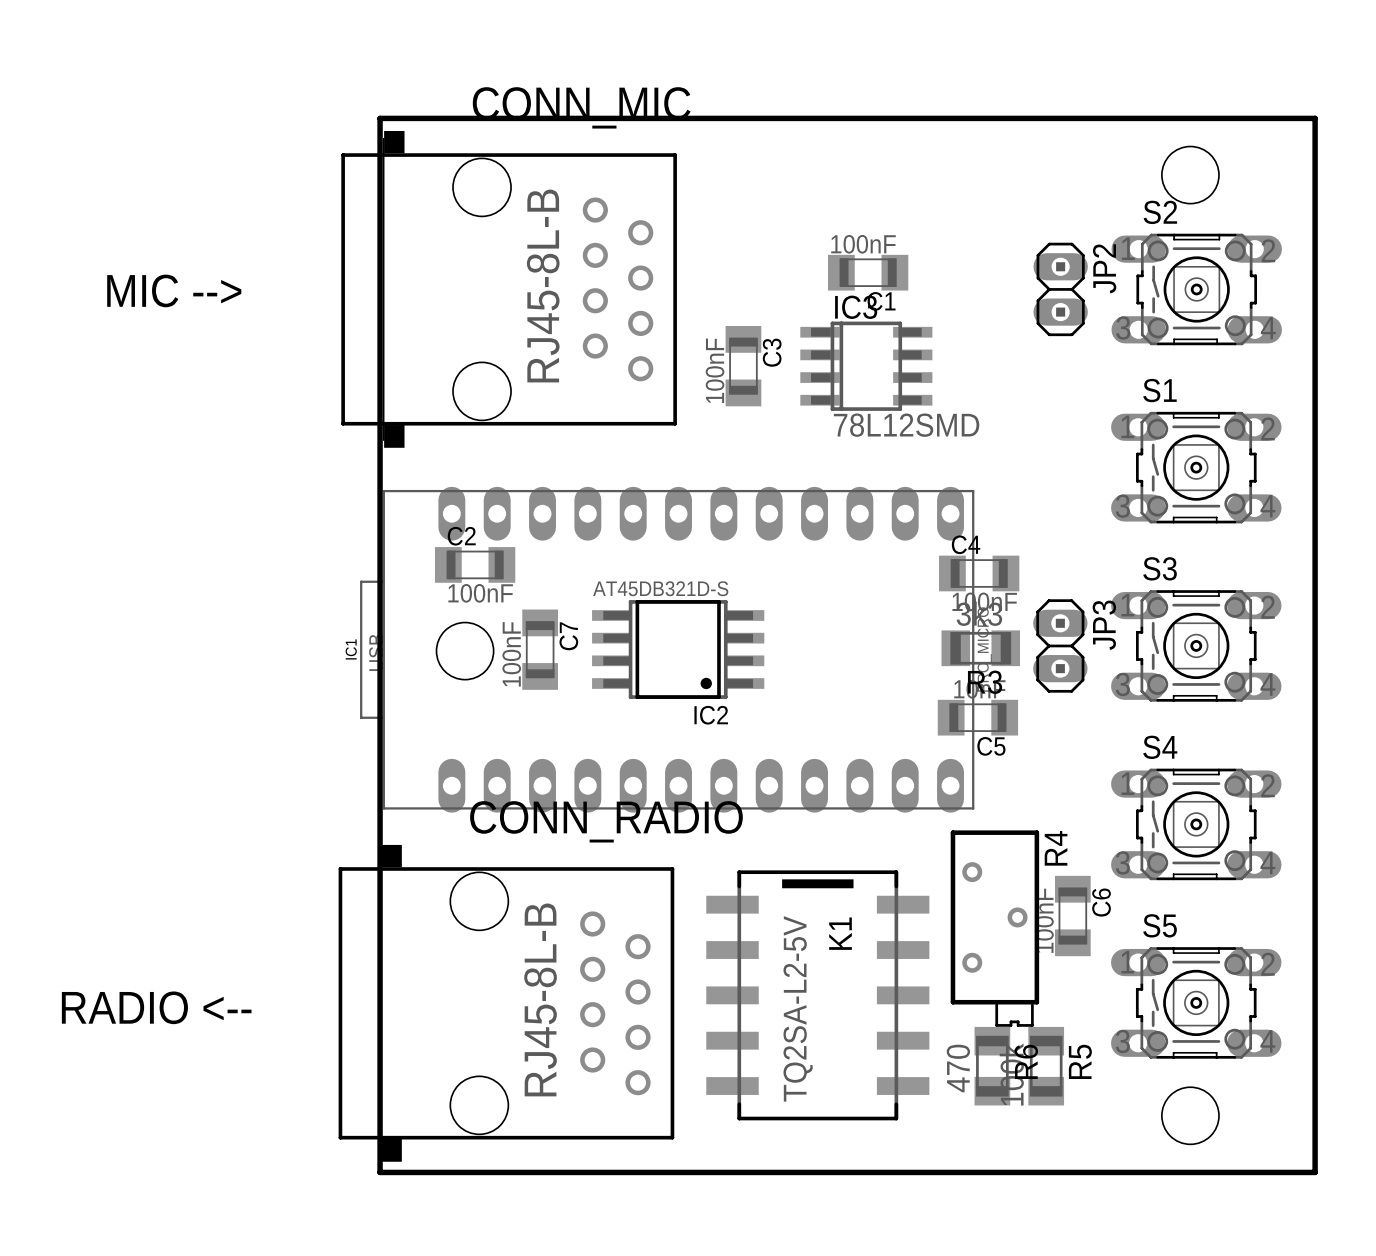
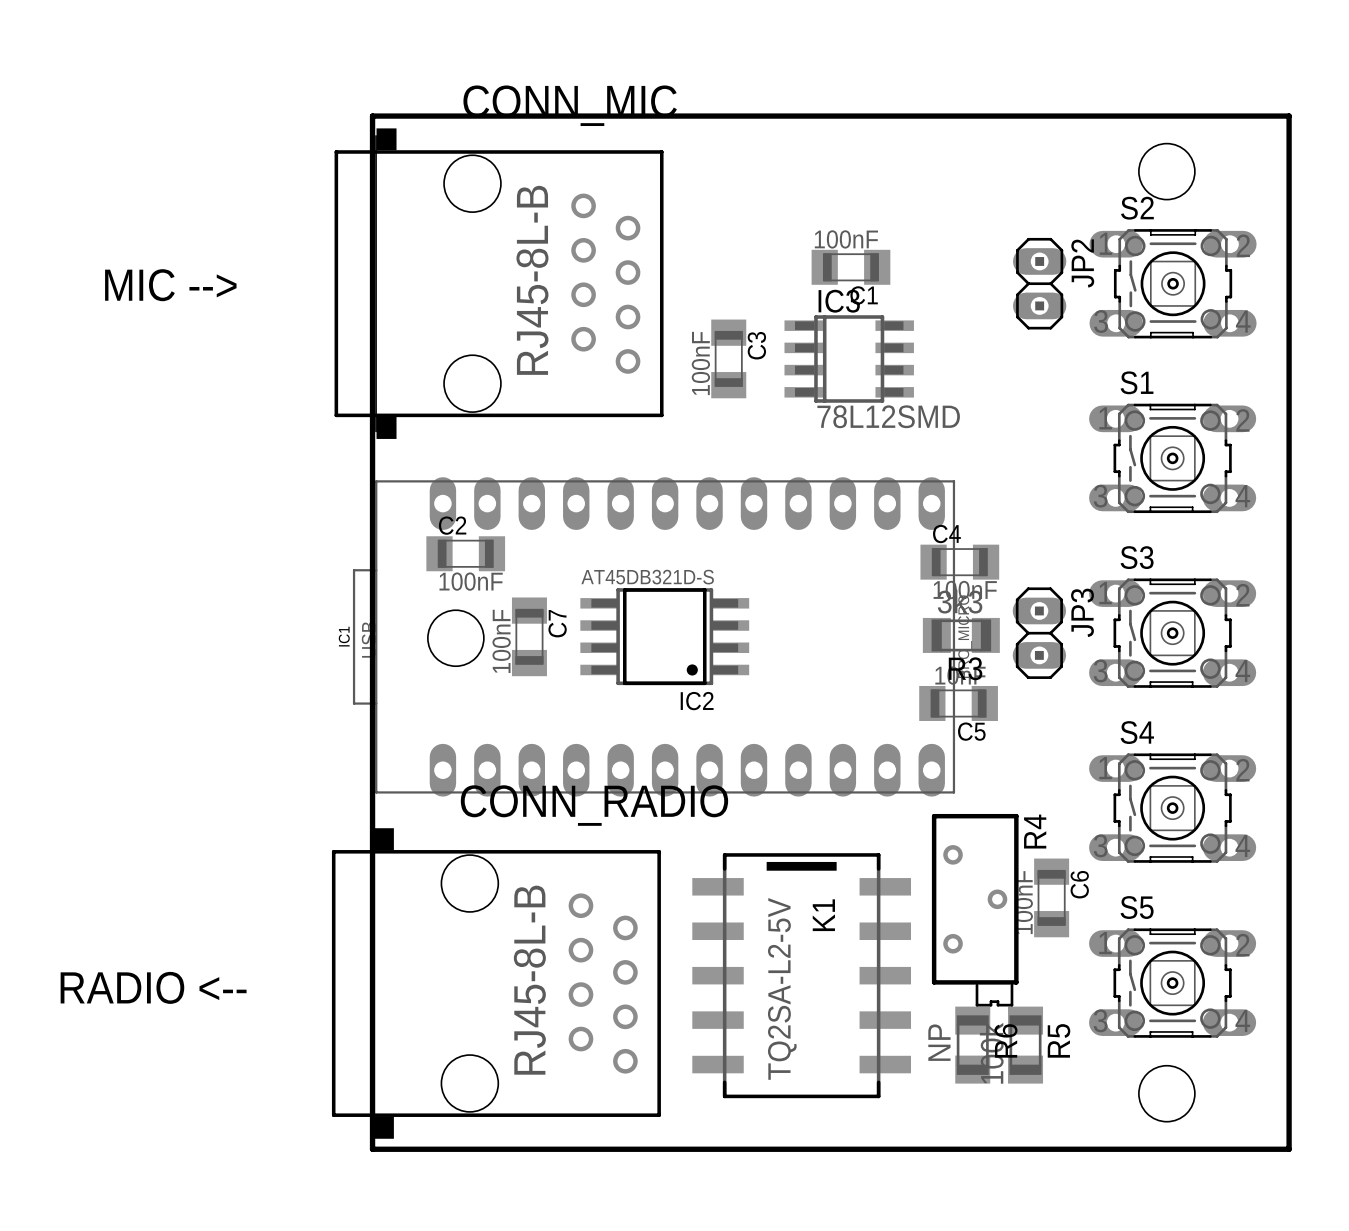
R6 value: 470 (958, 1068) -> NP (939, 1042)

